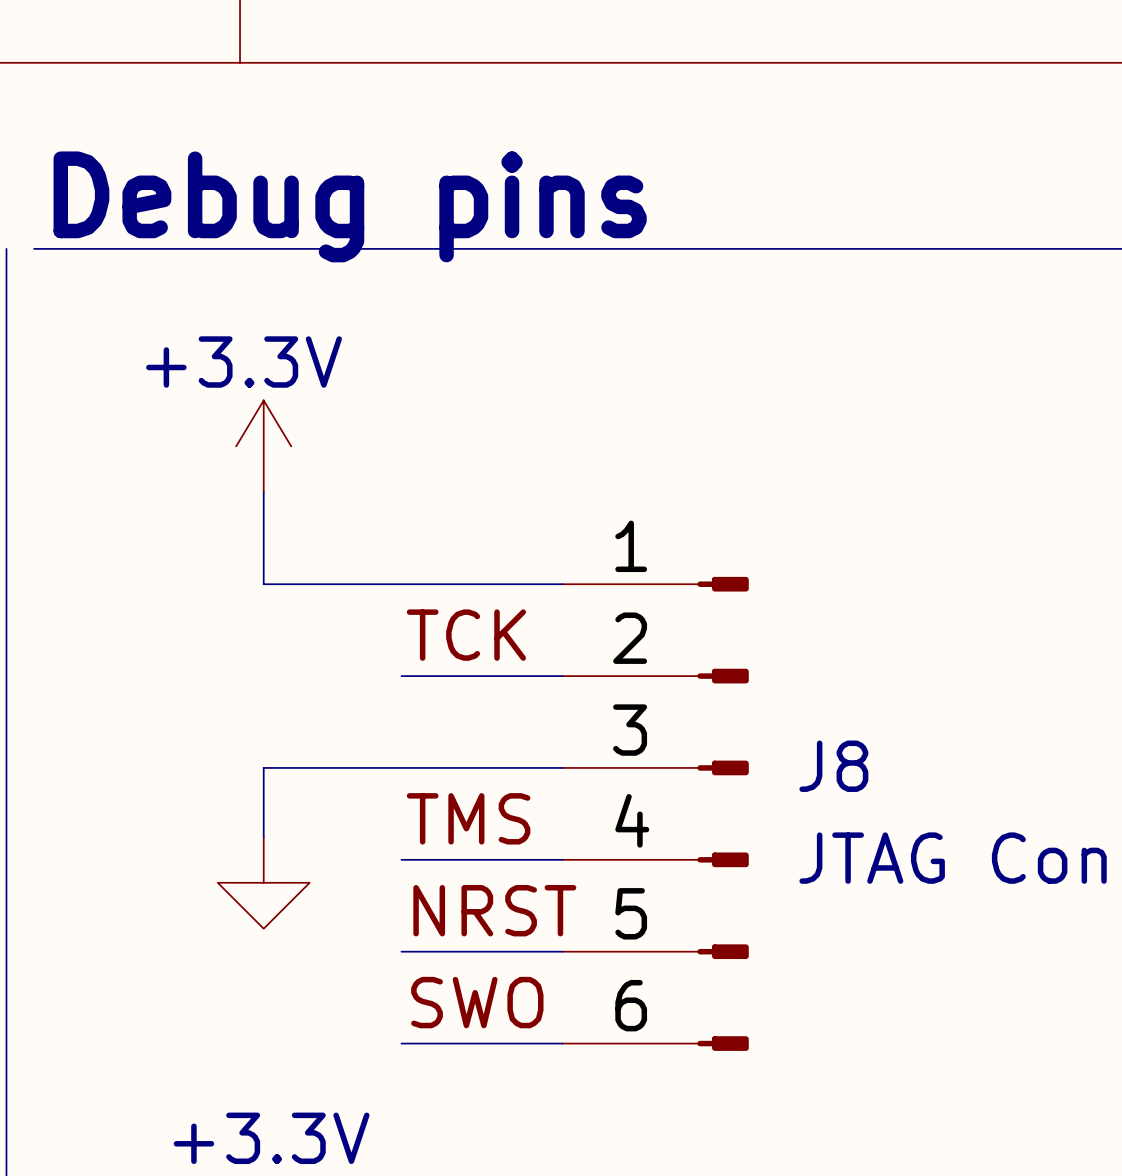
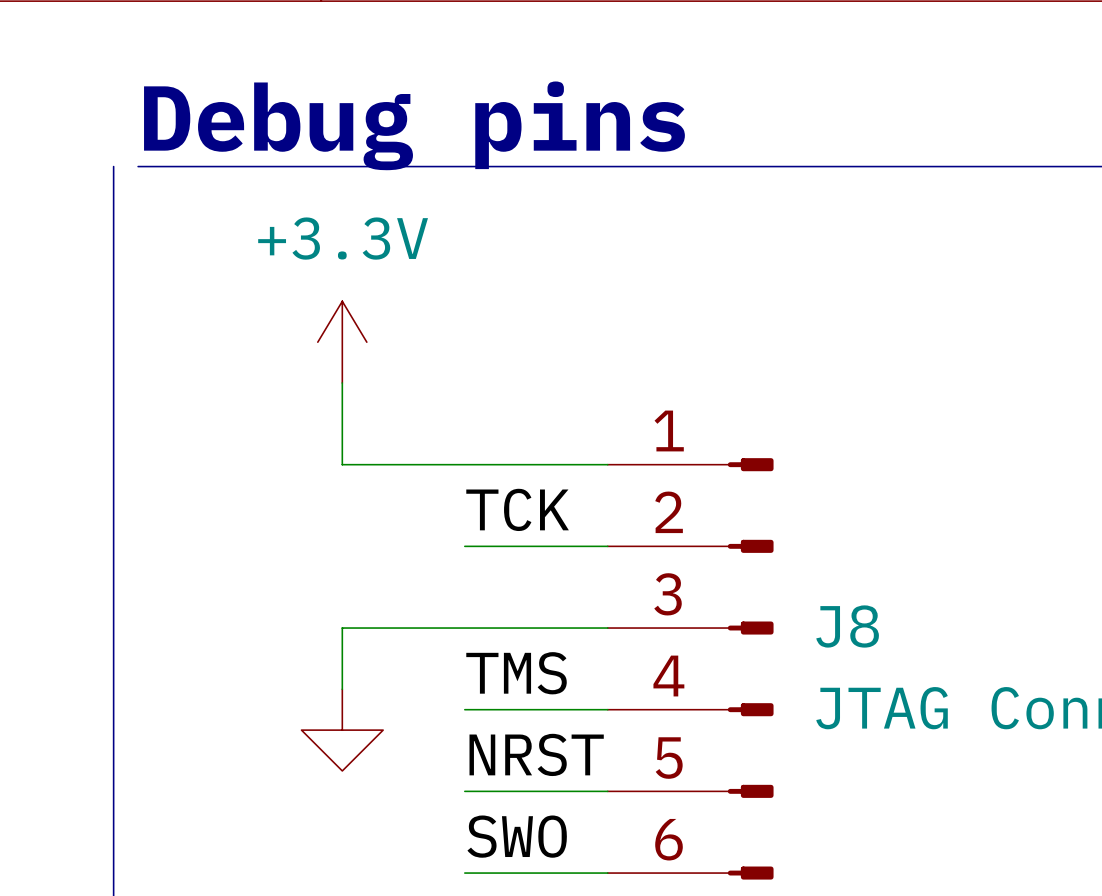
power symbol text position: +3.3V (244, 362) -> +3.3V (343, 238)

